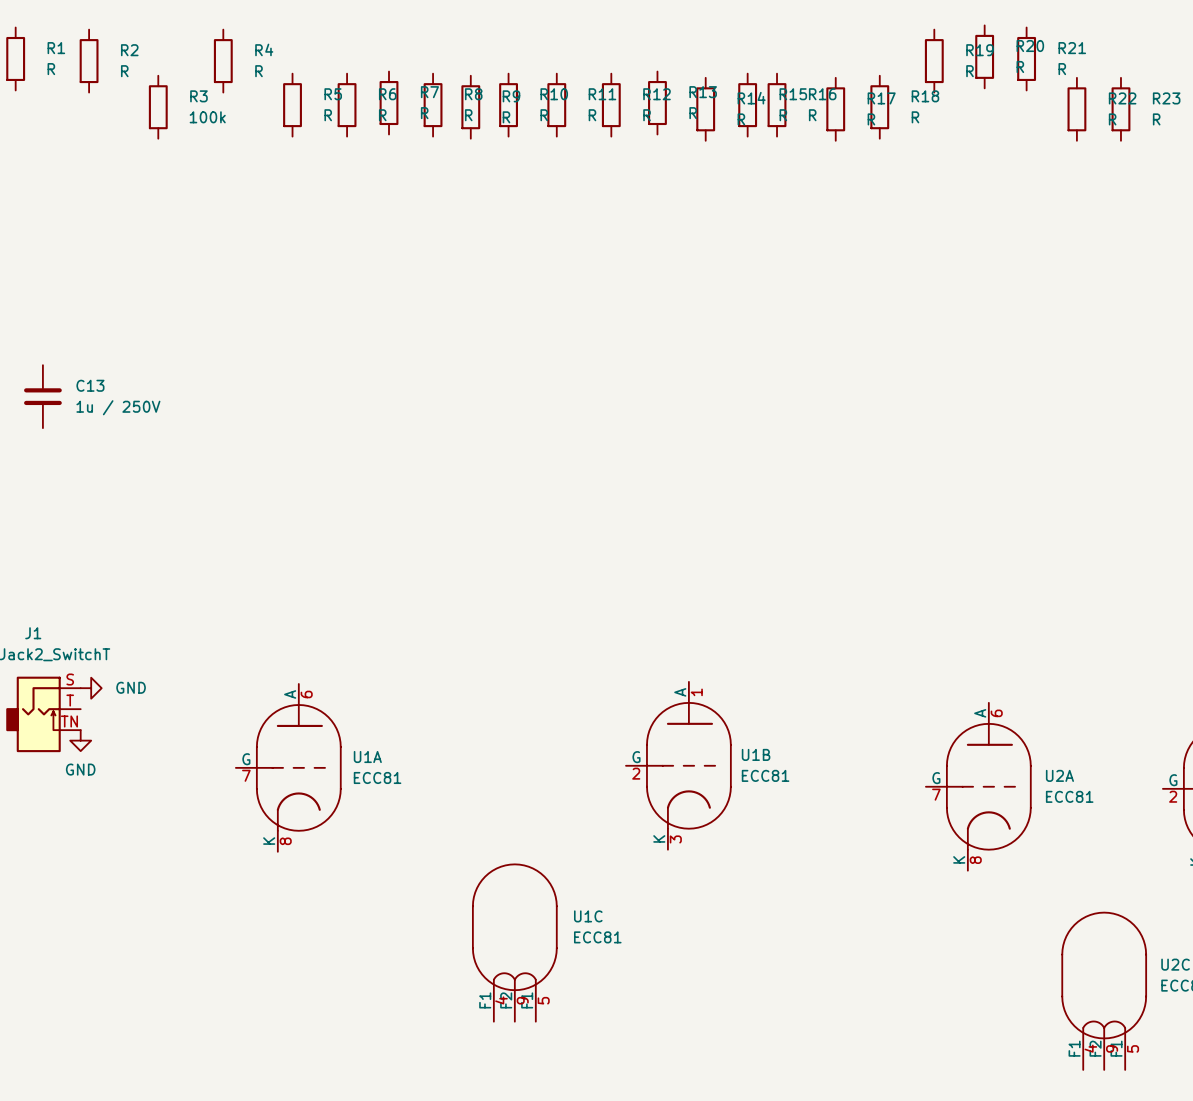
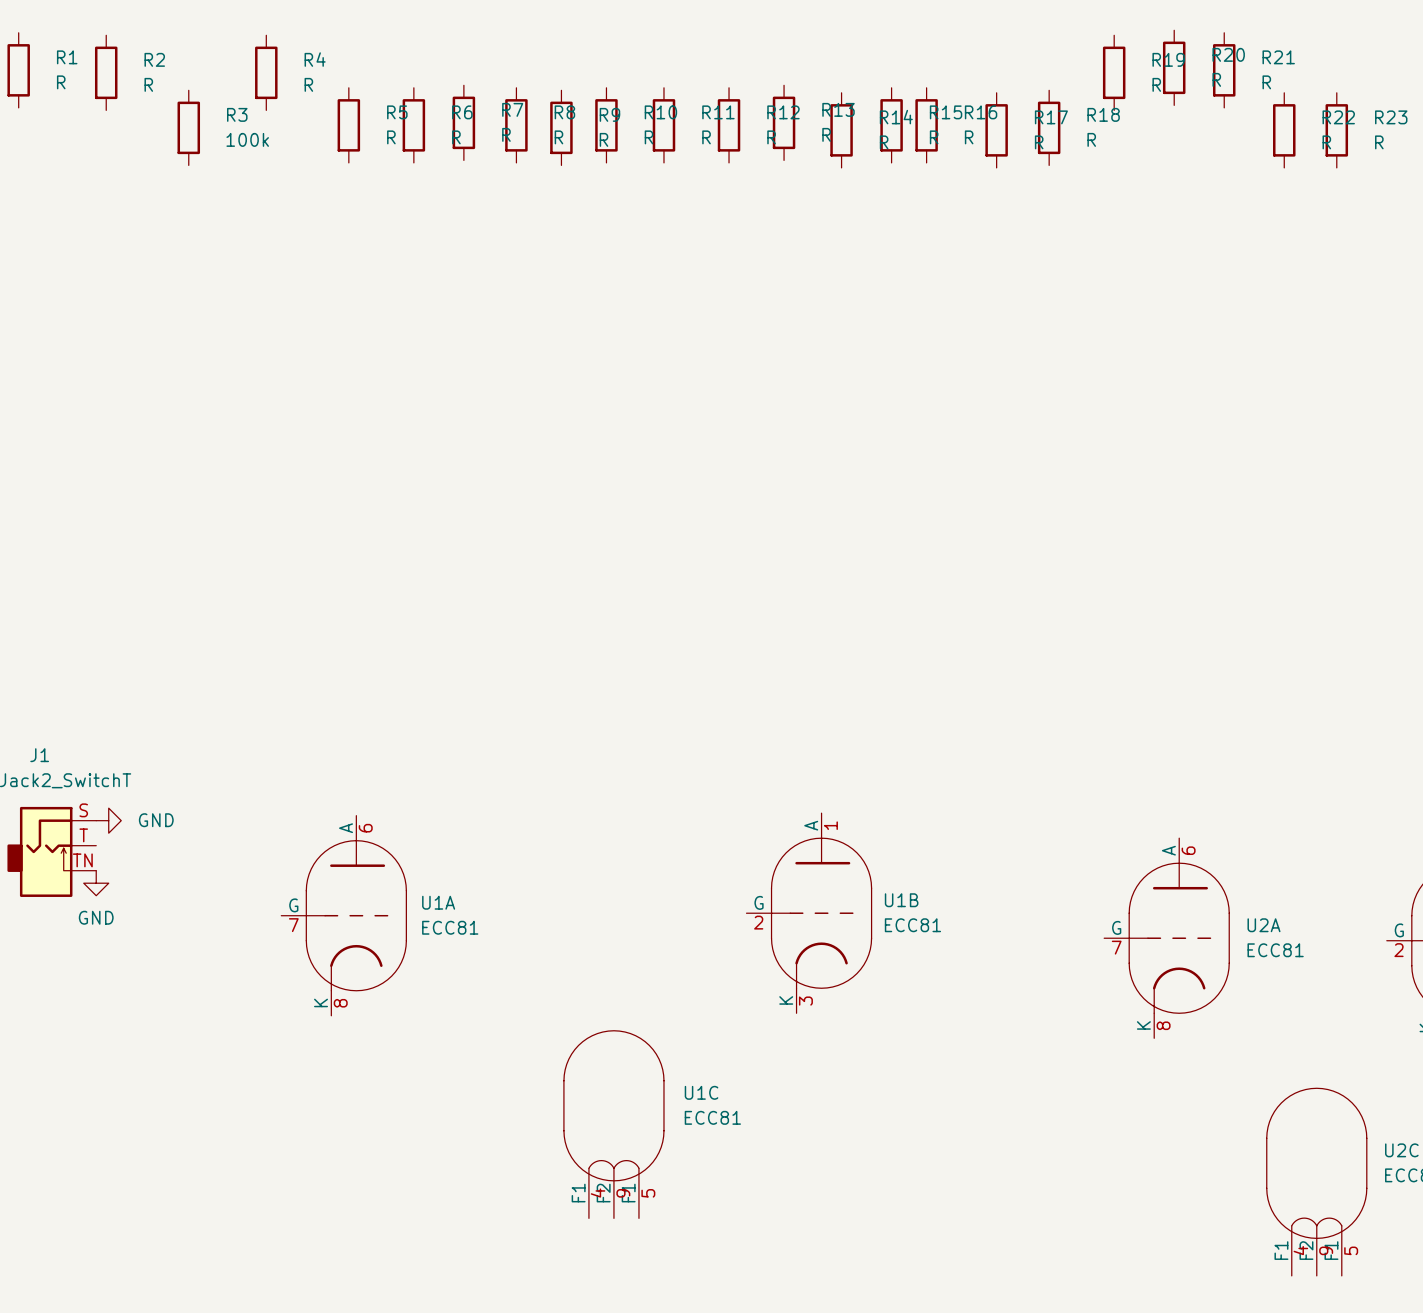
C13: 1u / 250V (42, 396) -> none

